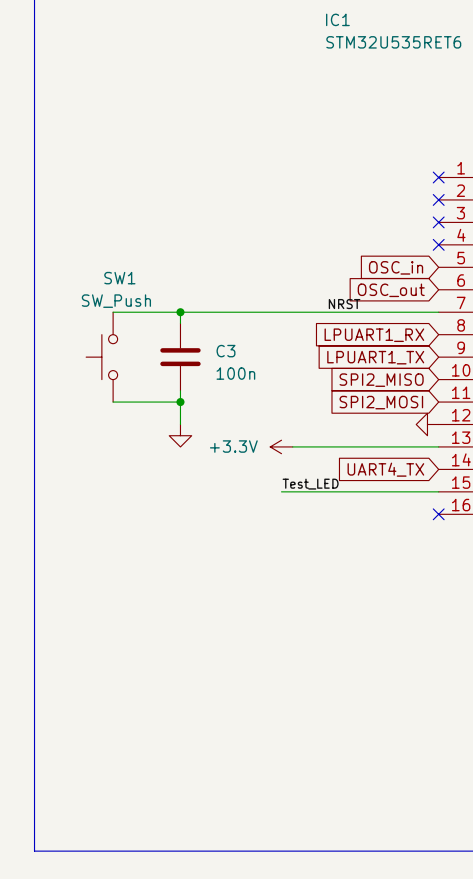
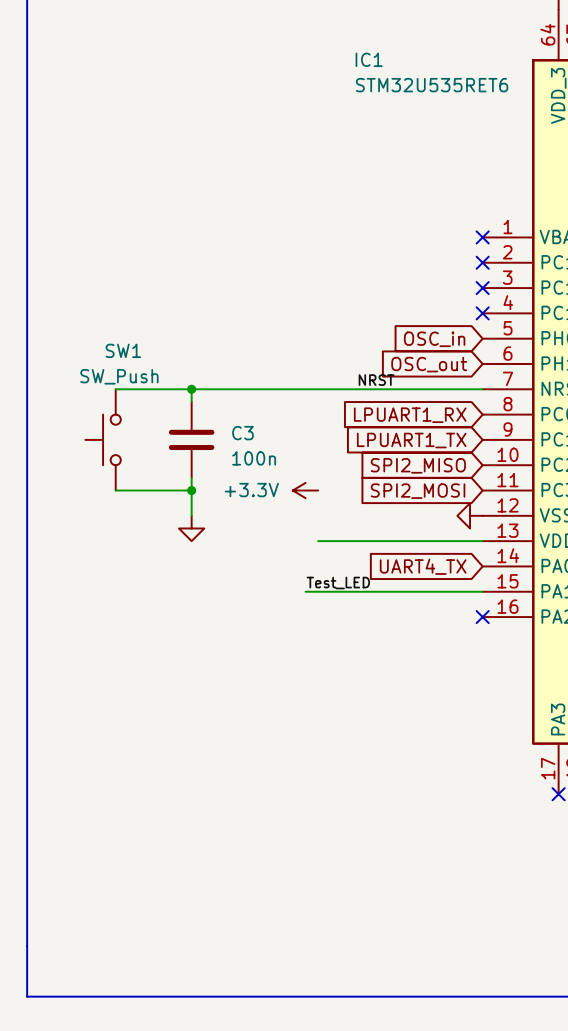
power symbol position: +3.3V (281, 446) -> +3.3V (305, 490)

